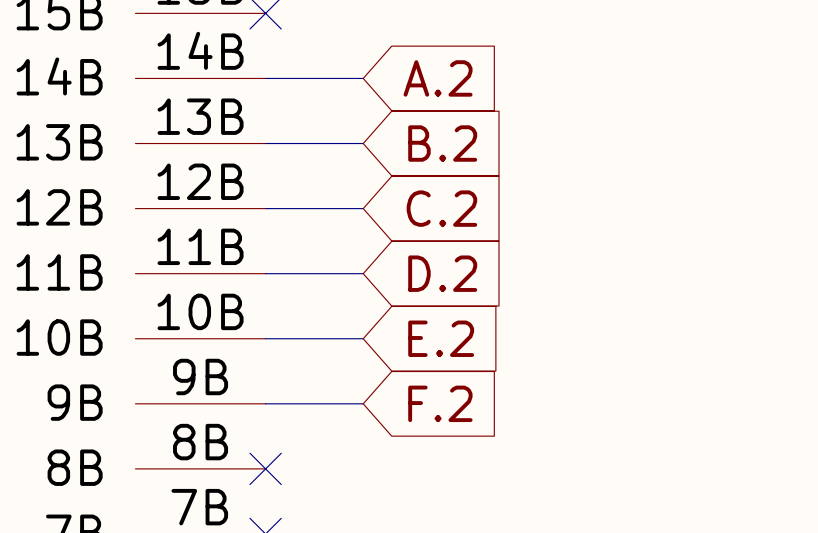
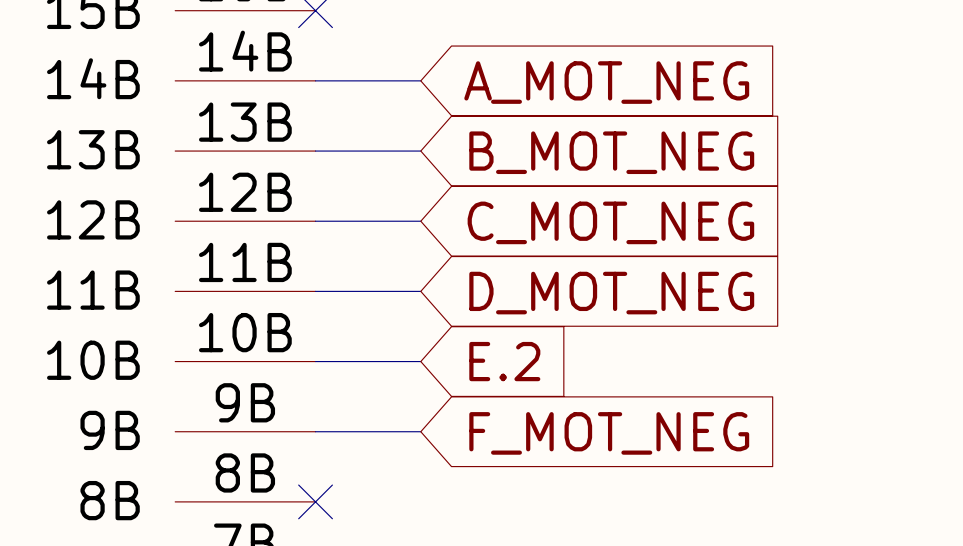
global label: A.2 (438, 78) -> A_MOT_NEG (606, 82)
global label: B.2 (442, 143) -> B_MOT_NEG (611, 152)
global label: C.2 (441, 208) -> C_MOT_NEG (610, 222)
global label: D.2 (442, 273) -> D_MOT_NEG (611, 293)
global label: F.2 (440, 403) -> F_MOT_NEG (609, 433)

